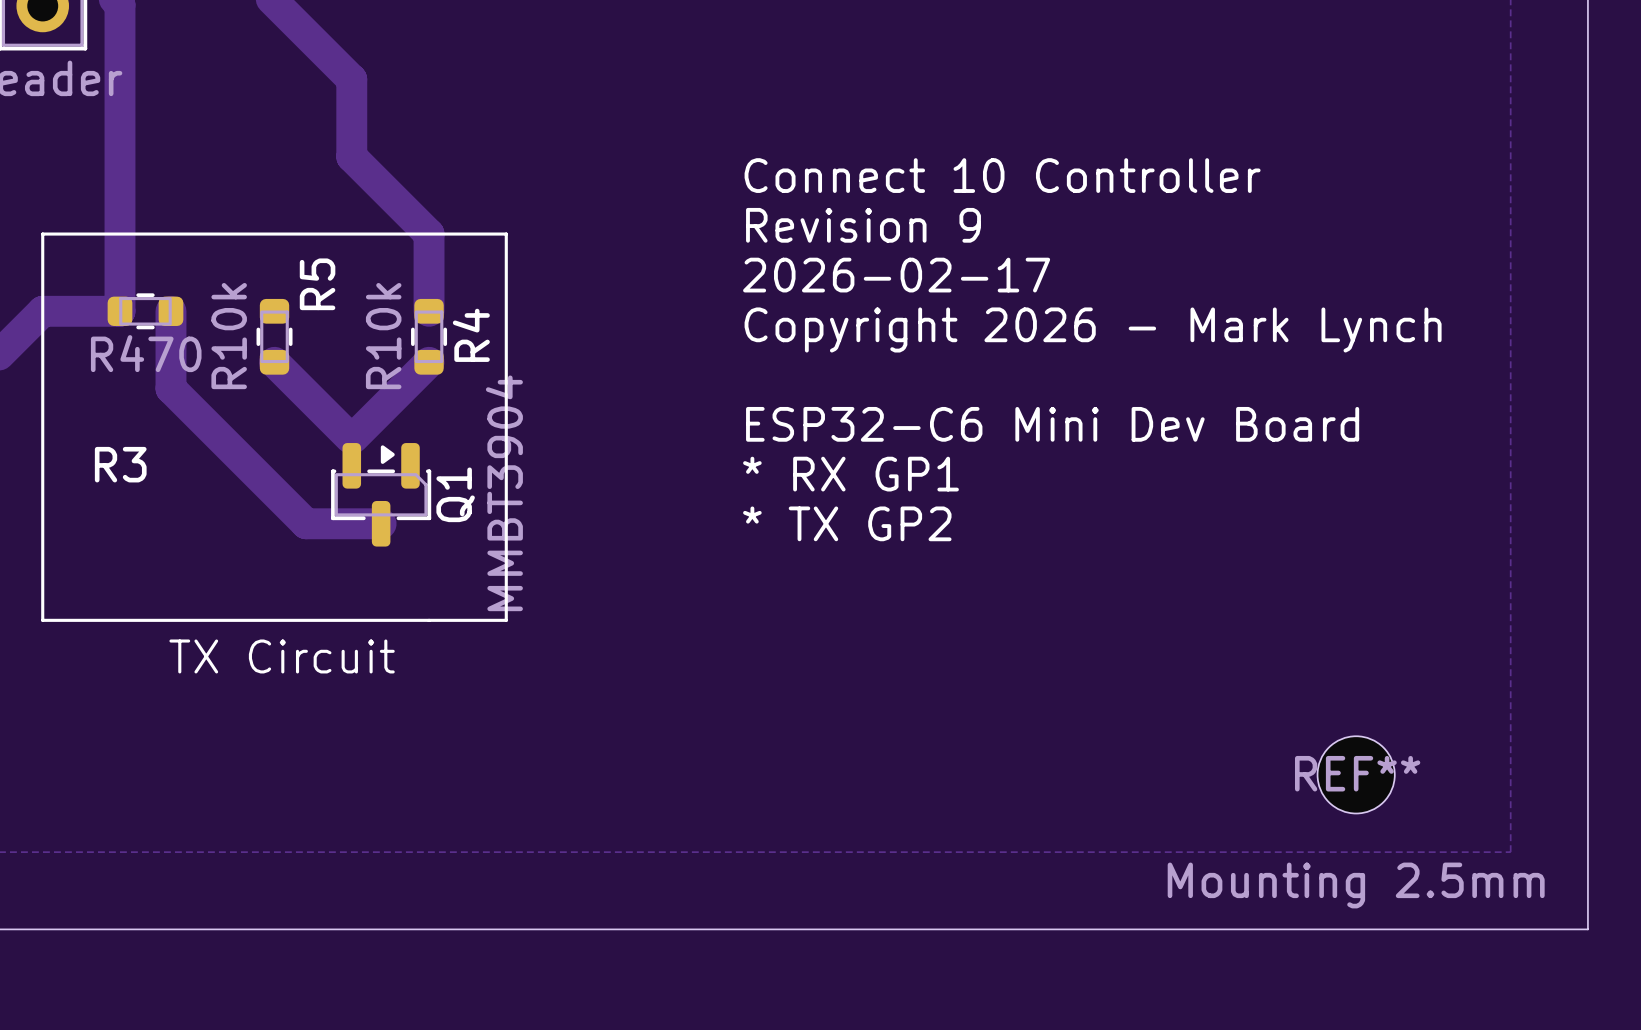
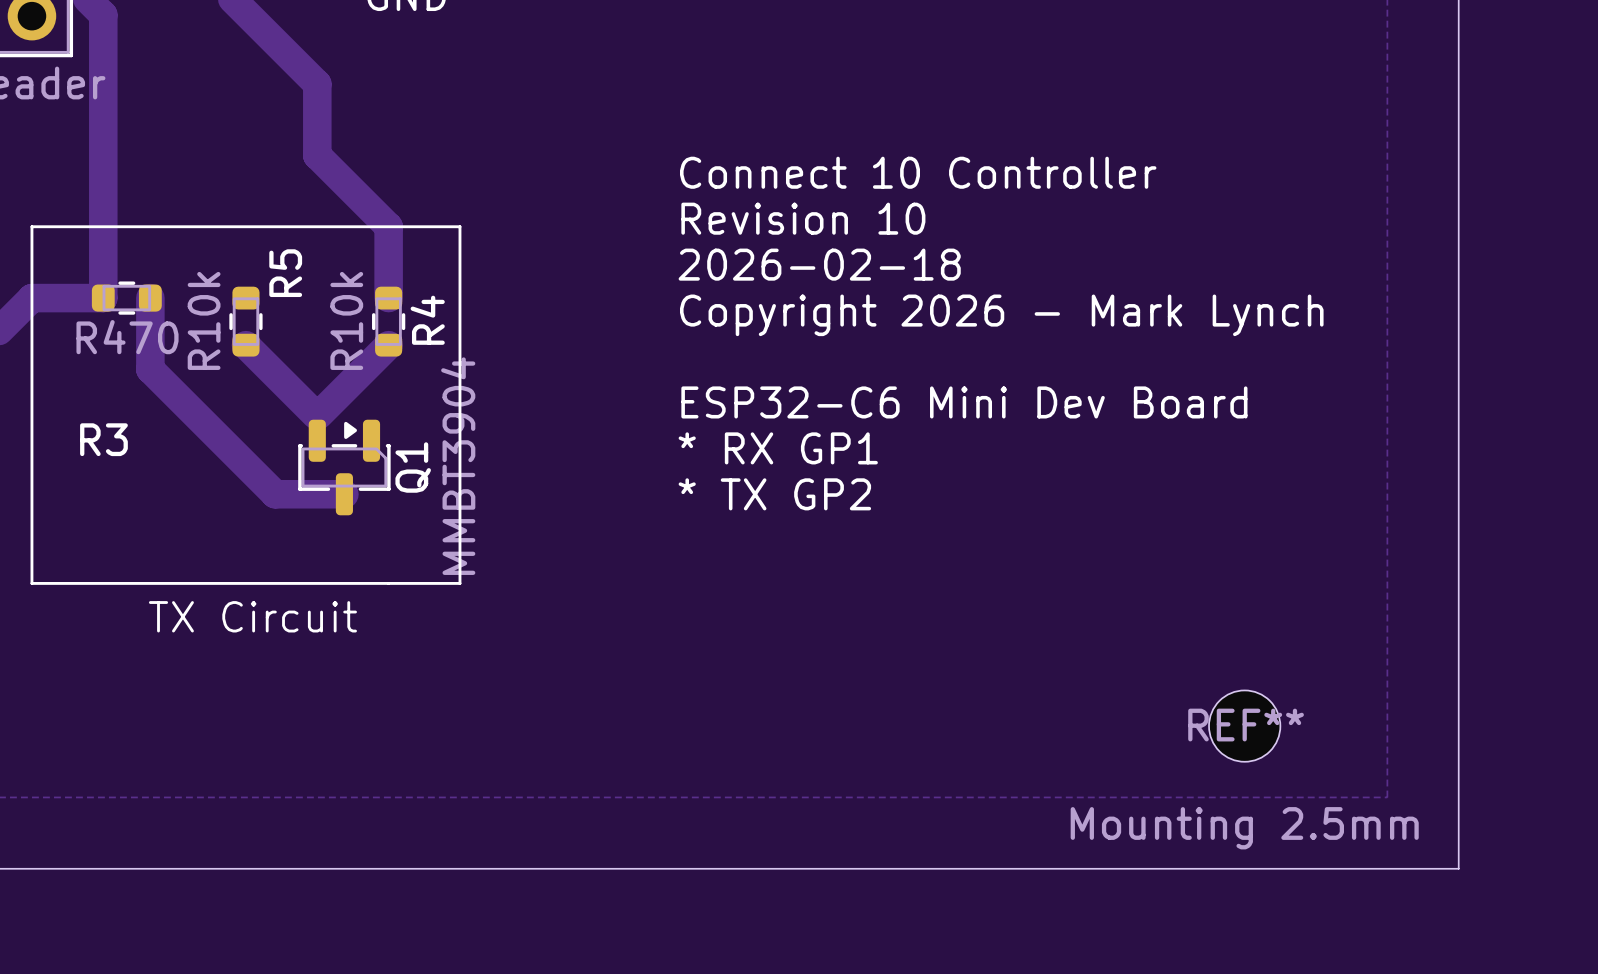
text: Revision 9 (863, 225) -> Revision 10 (803, 218)
text: 2026-02-17 (896, 275) -> 2026-02-18 (819, 264)

